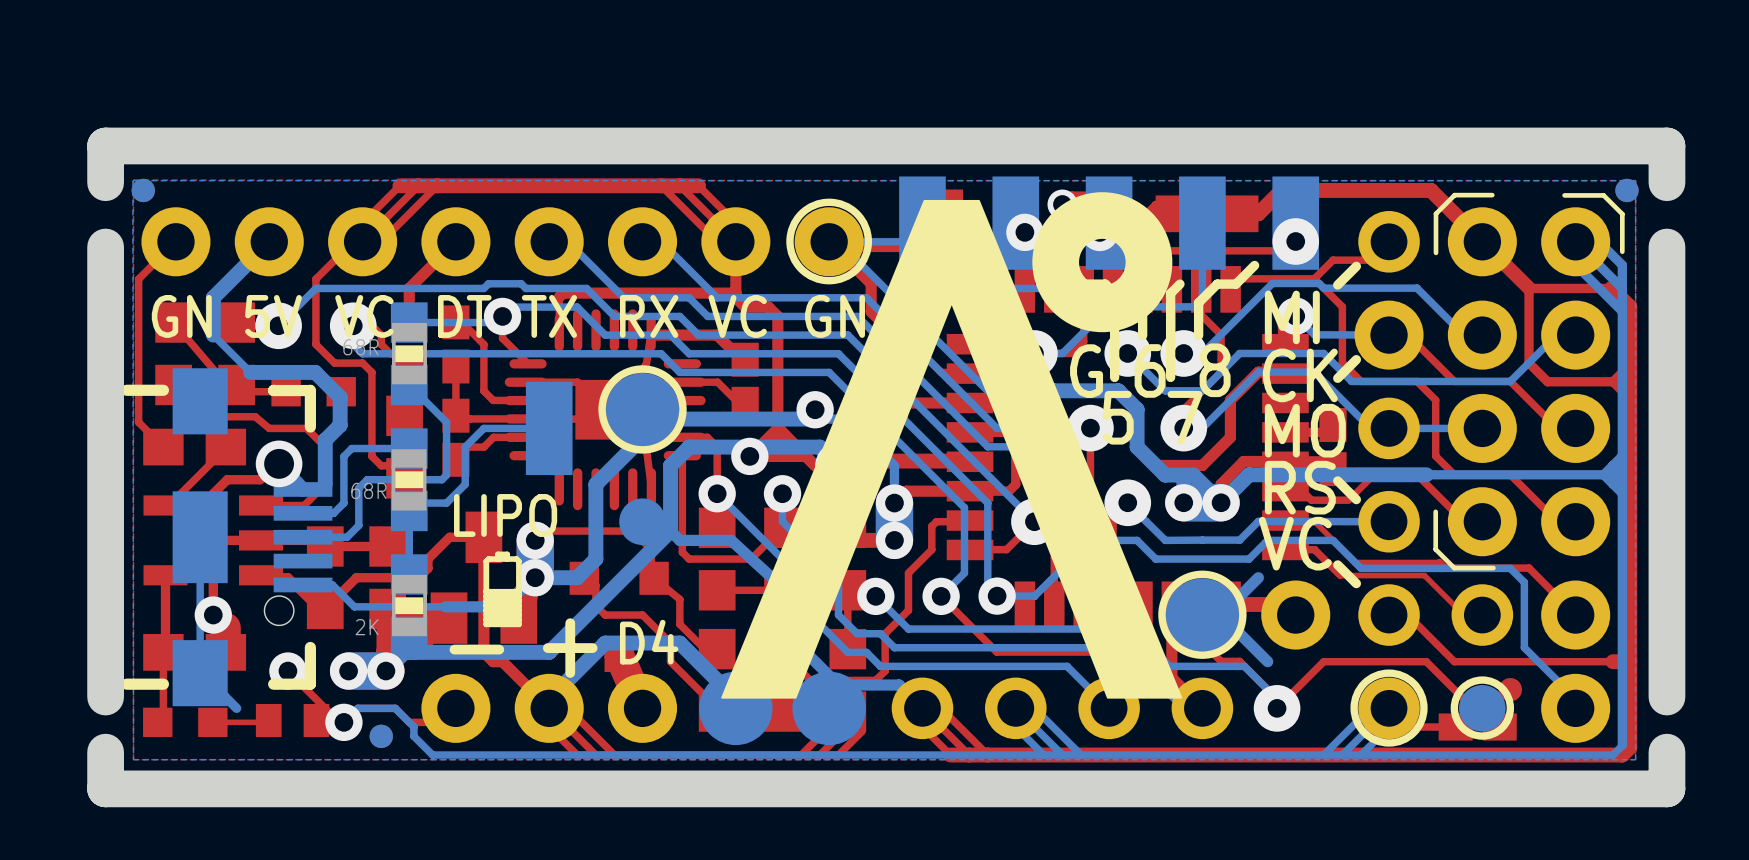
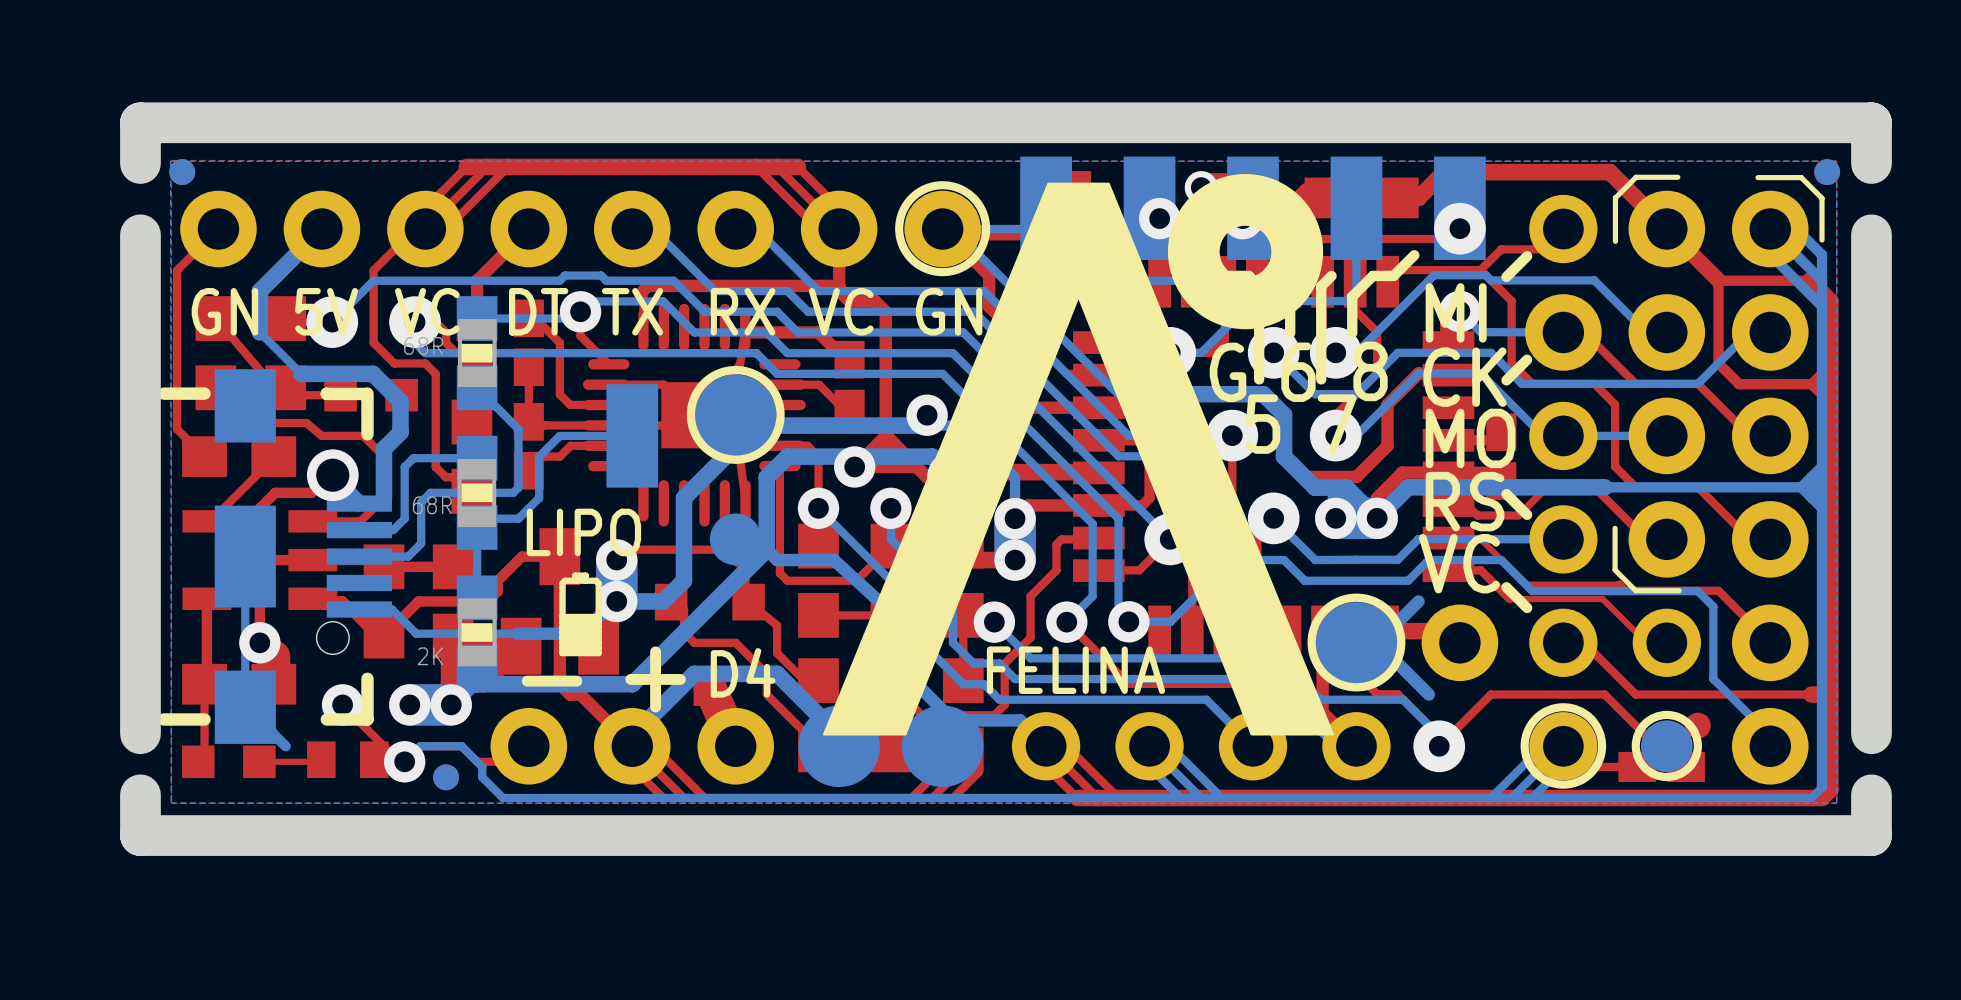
text: none -> FELINA (1075, 670)

